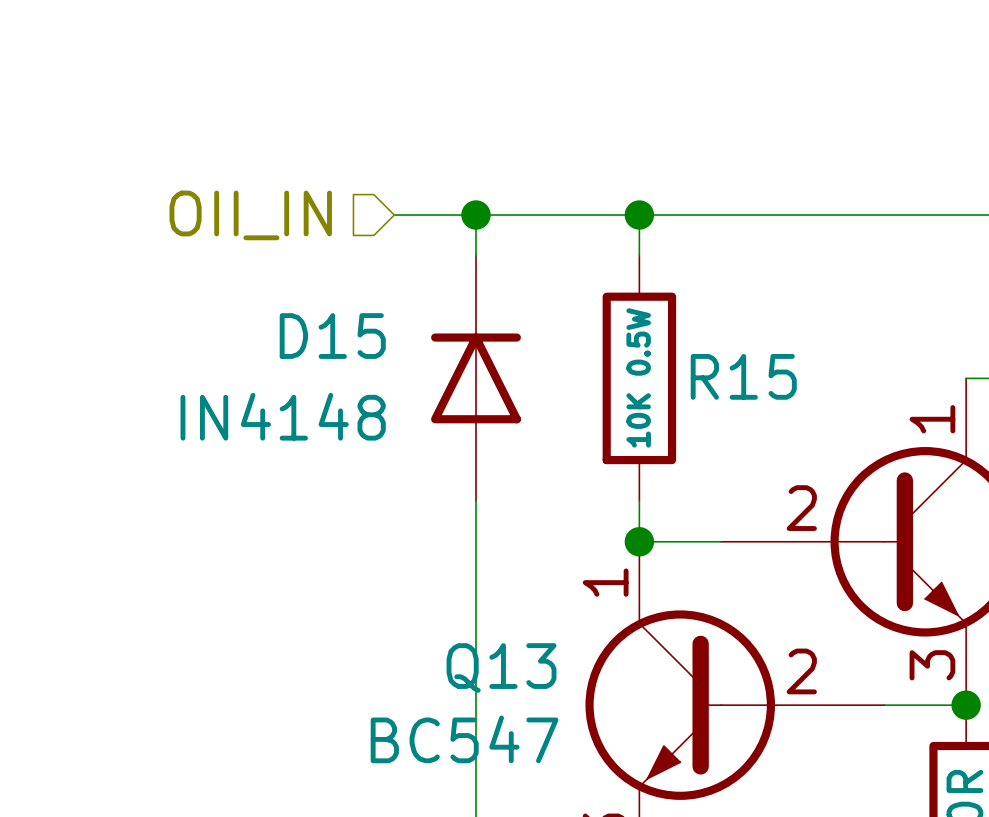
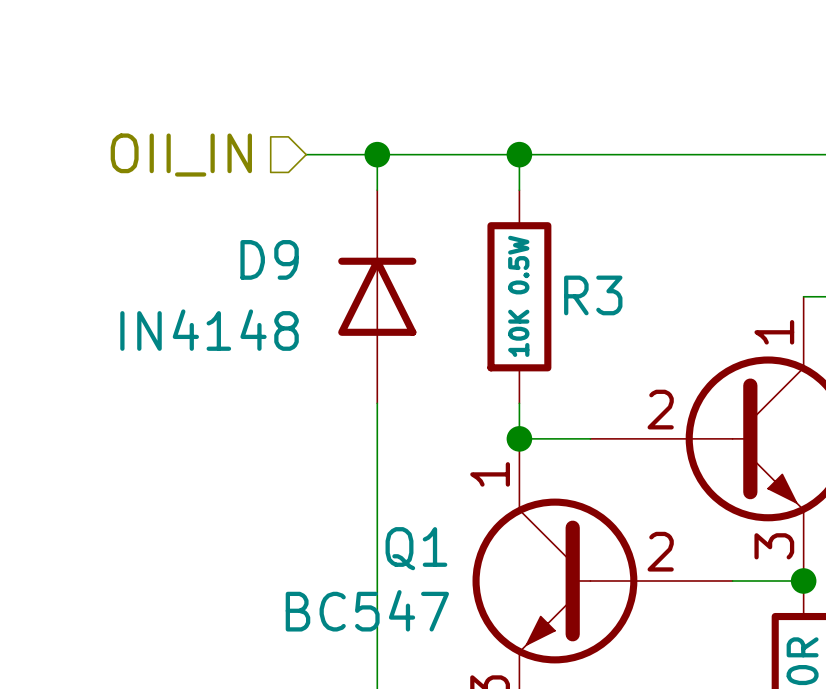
D15 name: D15 (332, 336) -> D9 (269, 259)
R15 name: R15 (743, 376) -> R3 (593, 295)
Q13 name: Q13 (501, 667) -> Q1 (416, 548)

